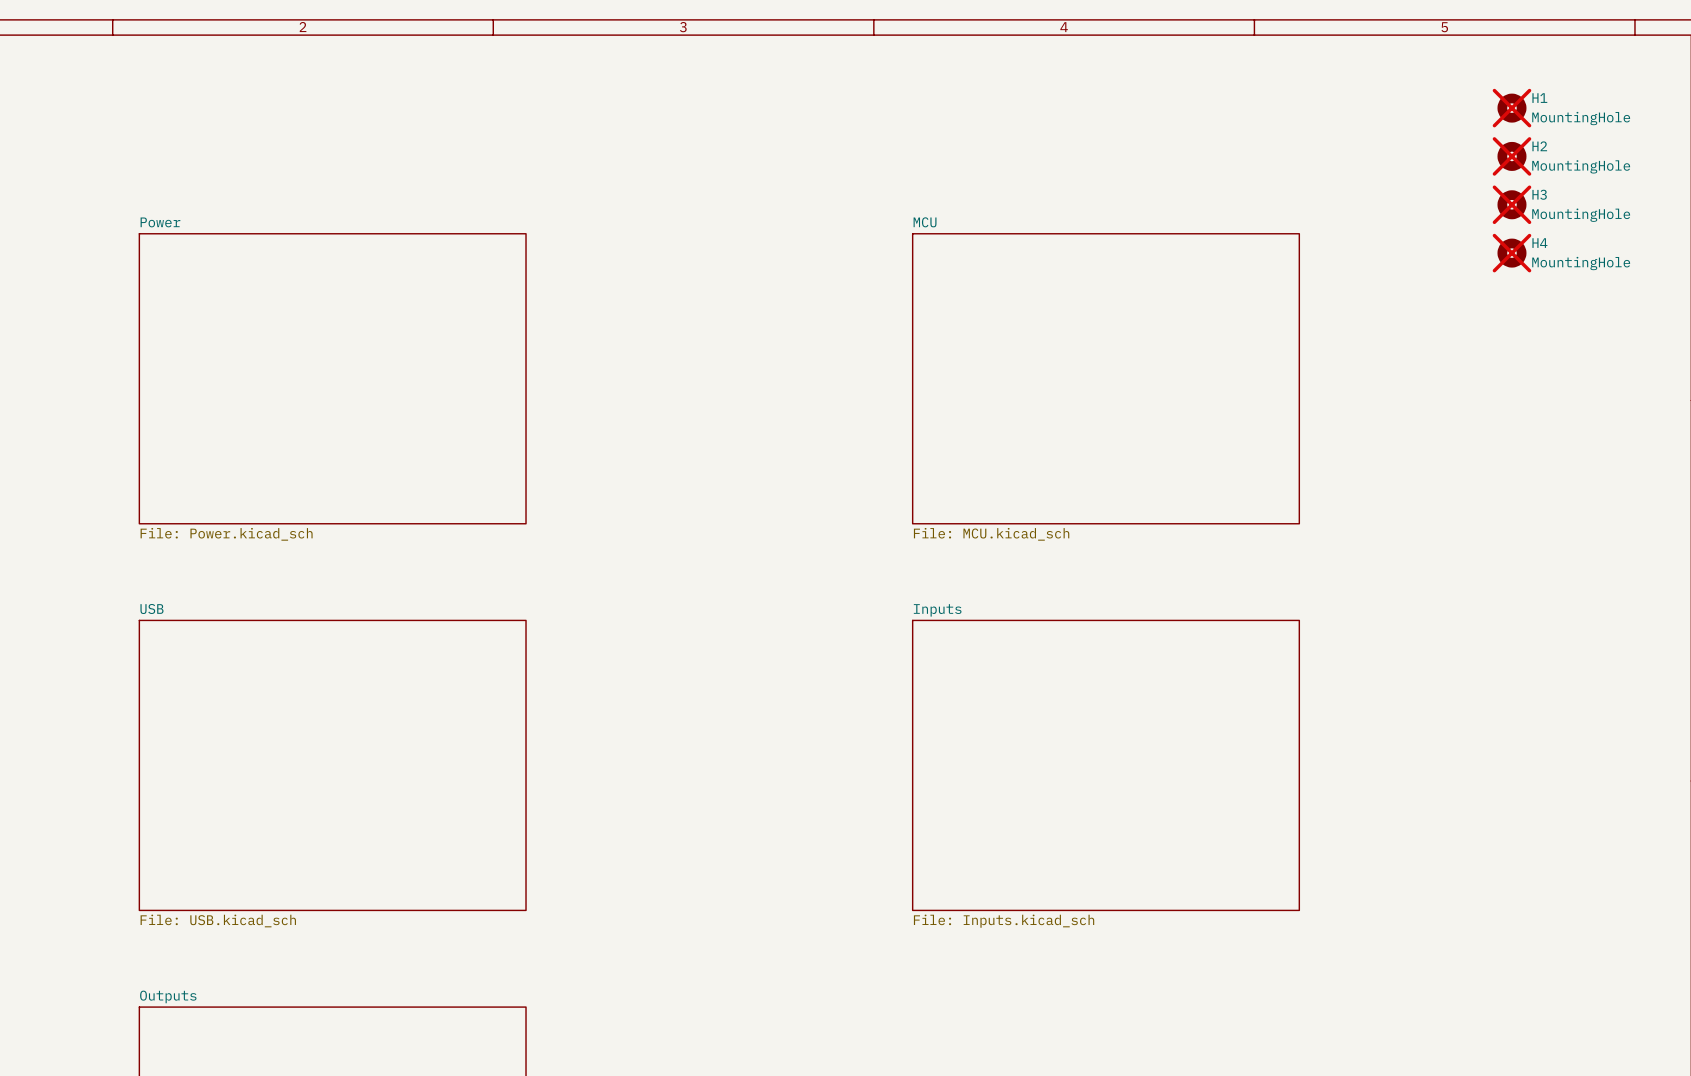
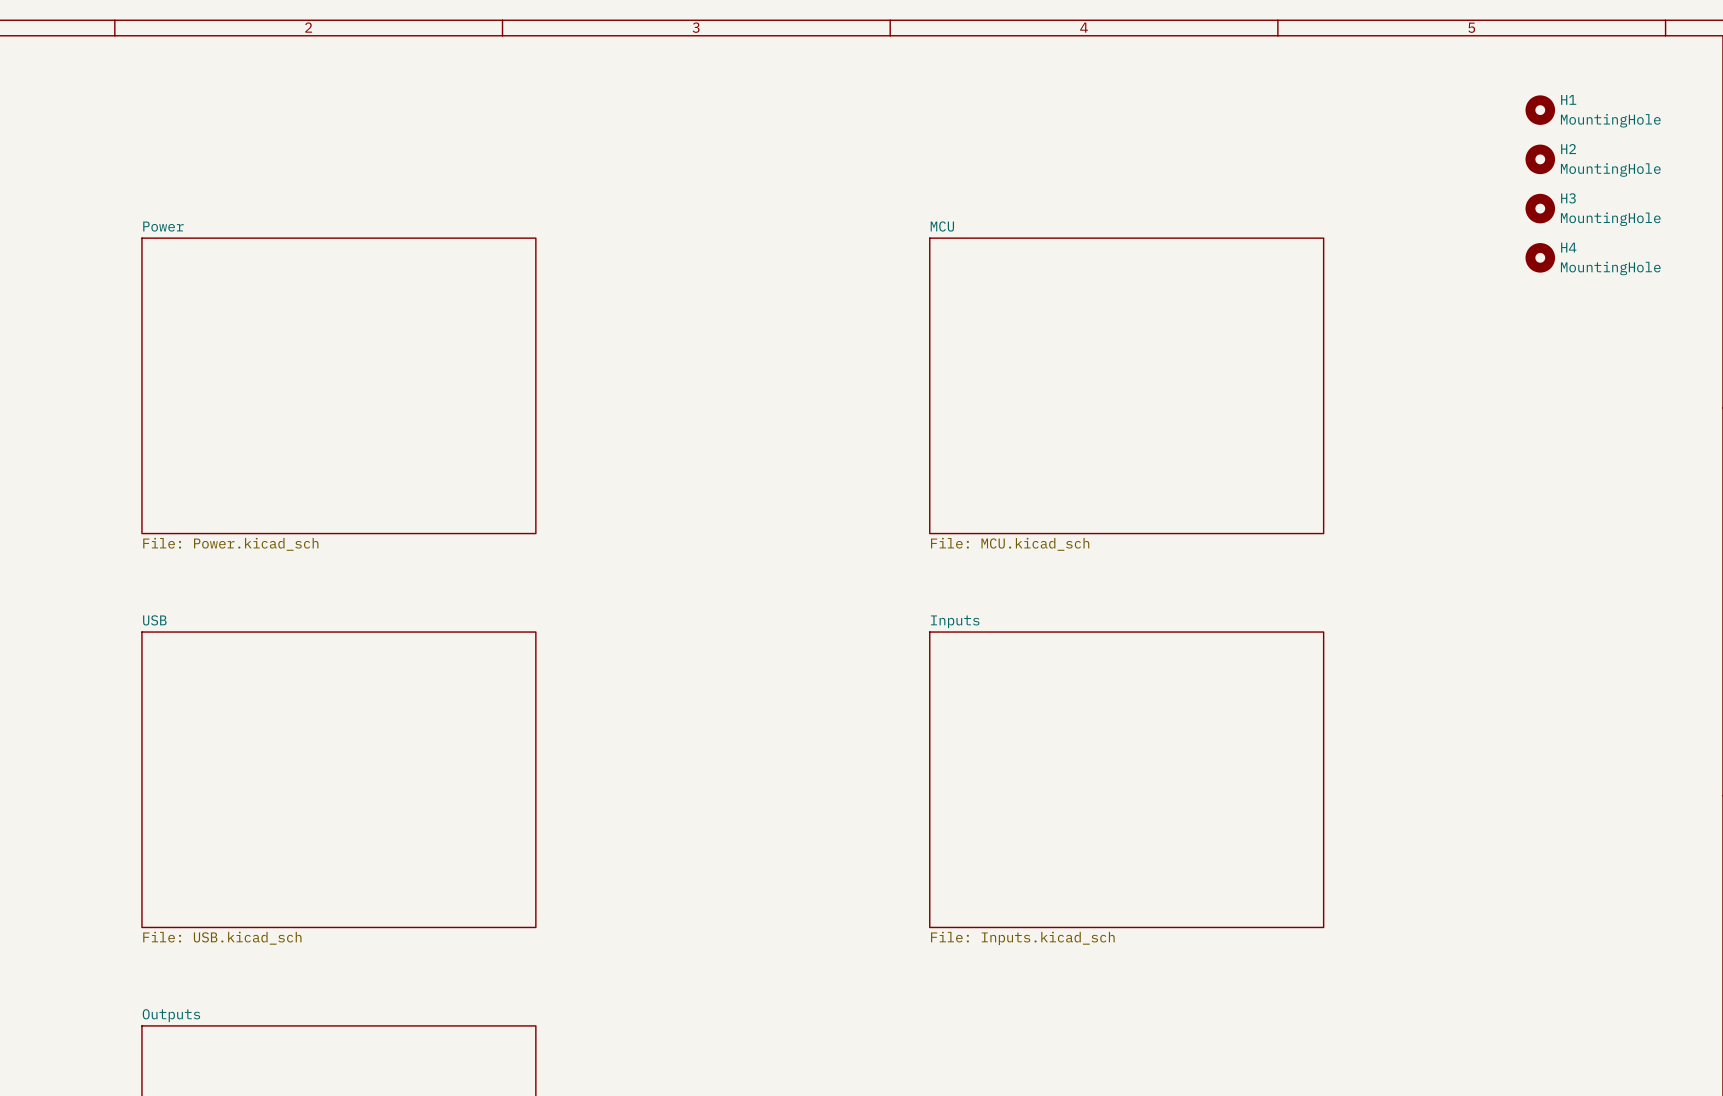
H1 do-not-place cross: (1511, 108) -> none
H2 do-not-place cross: (1511, 156) -> none
H3 do-not-place cross: (1511, 204) -> none
H4 do-not-place cross: (1511, 253) -> none

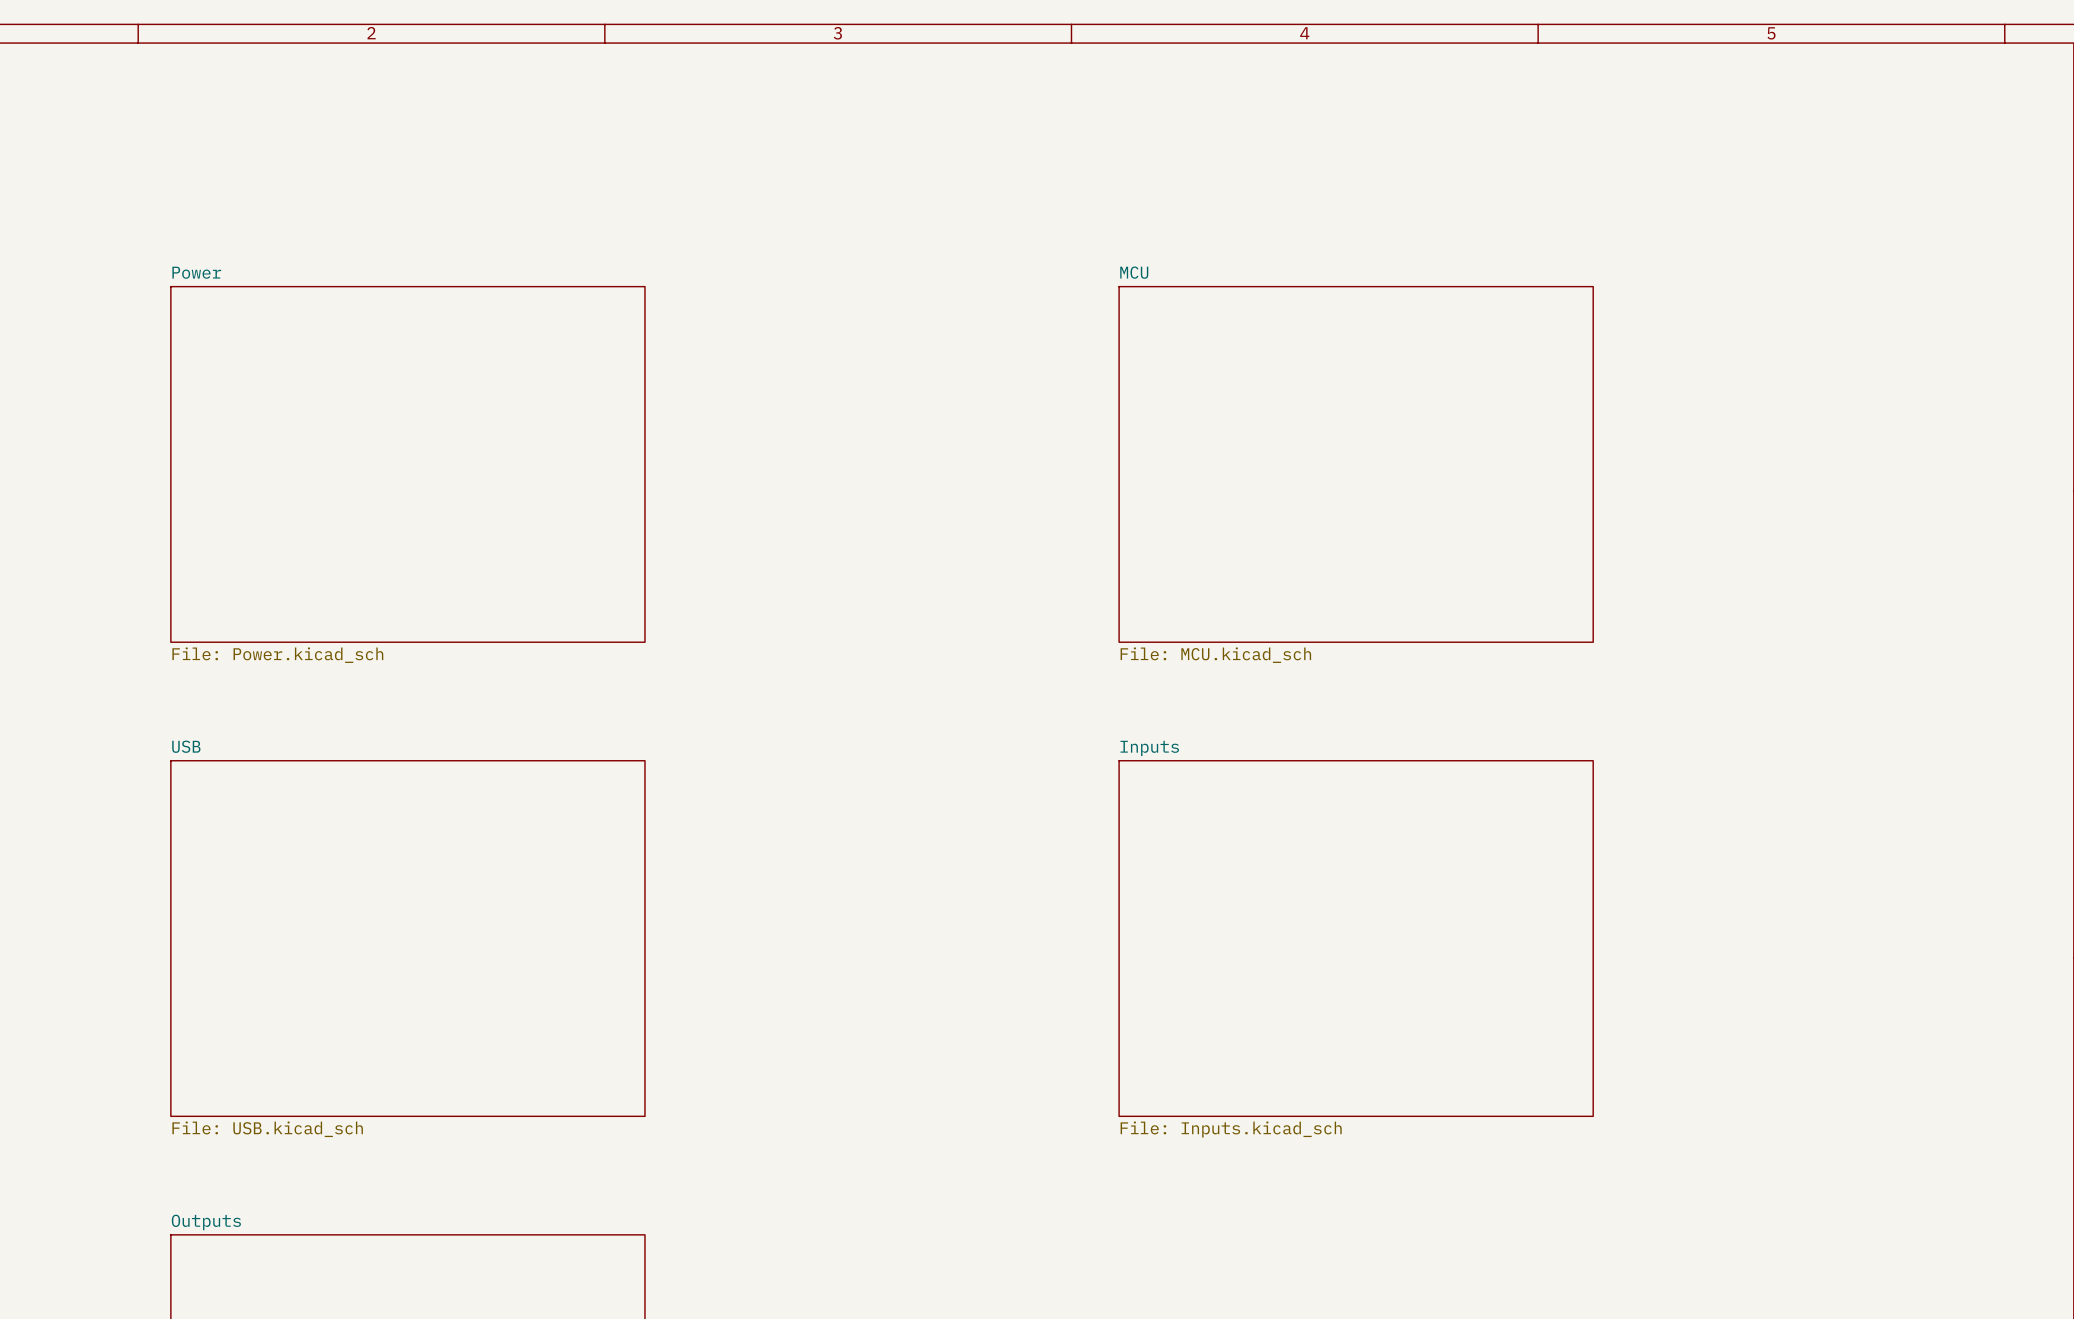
H1: MountingHole (1540, 110) -> none
H2: MountingHole (1540, 159) -> none
H3: MountingHole (1540, 208) -> none
H4: MountingHole (1540, 257) -> none

